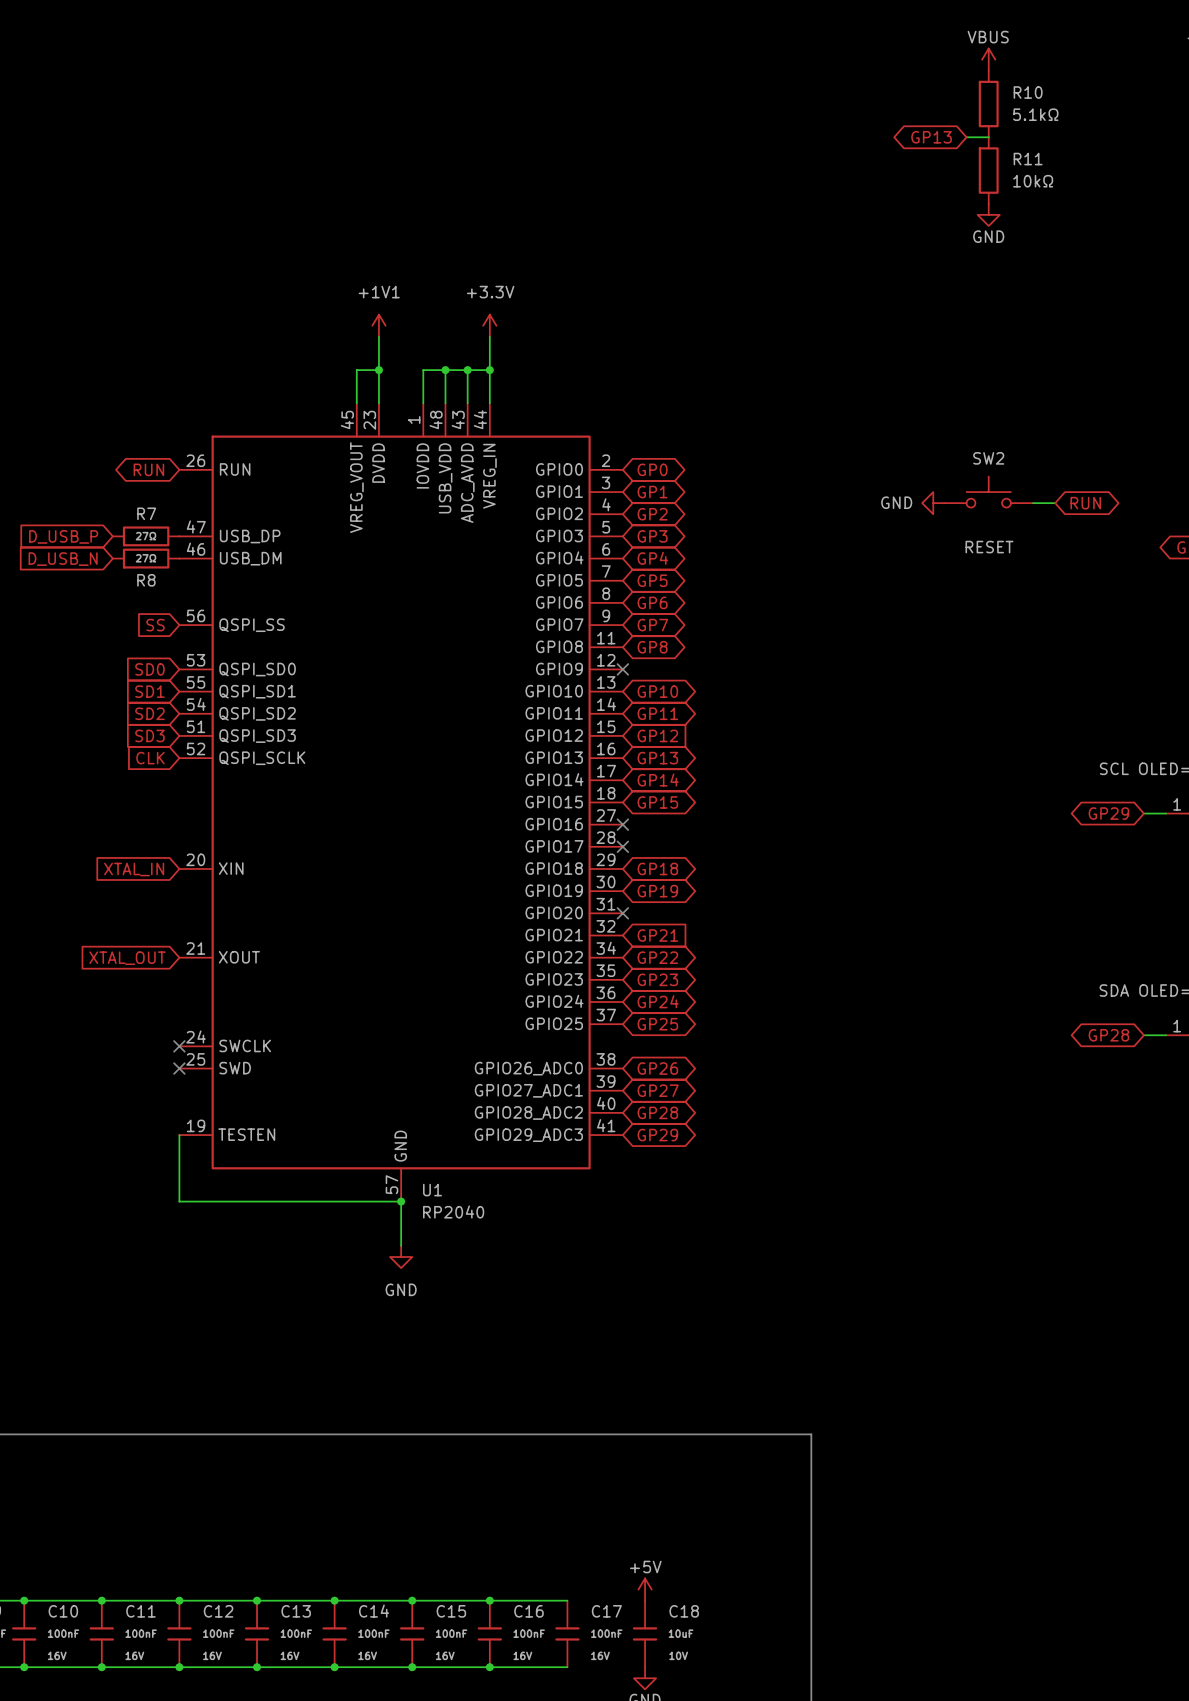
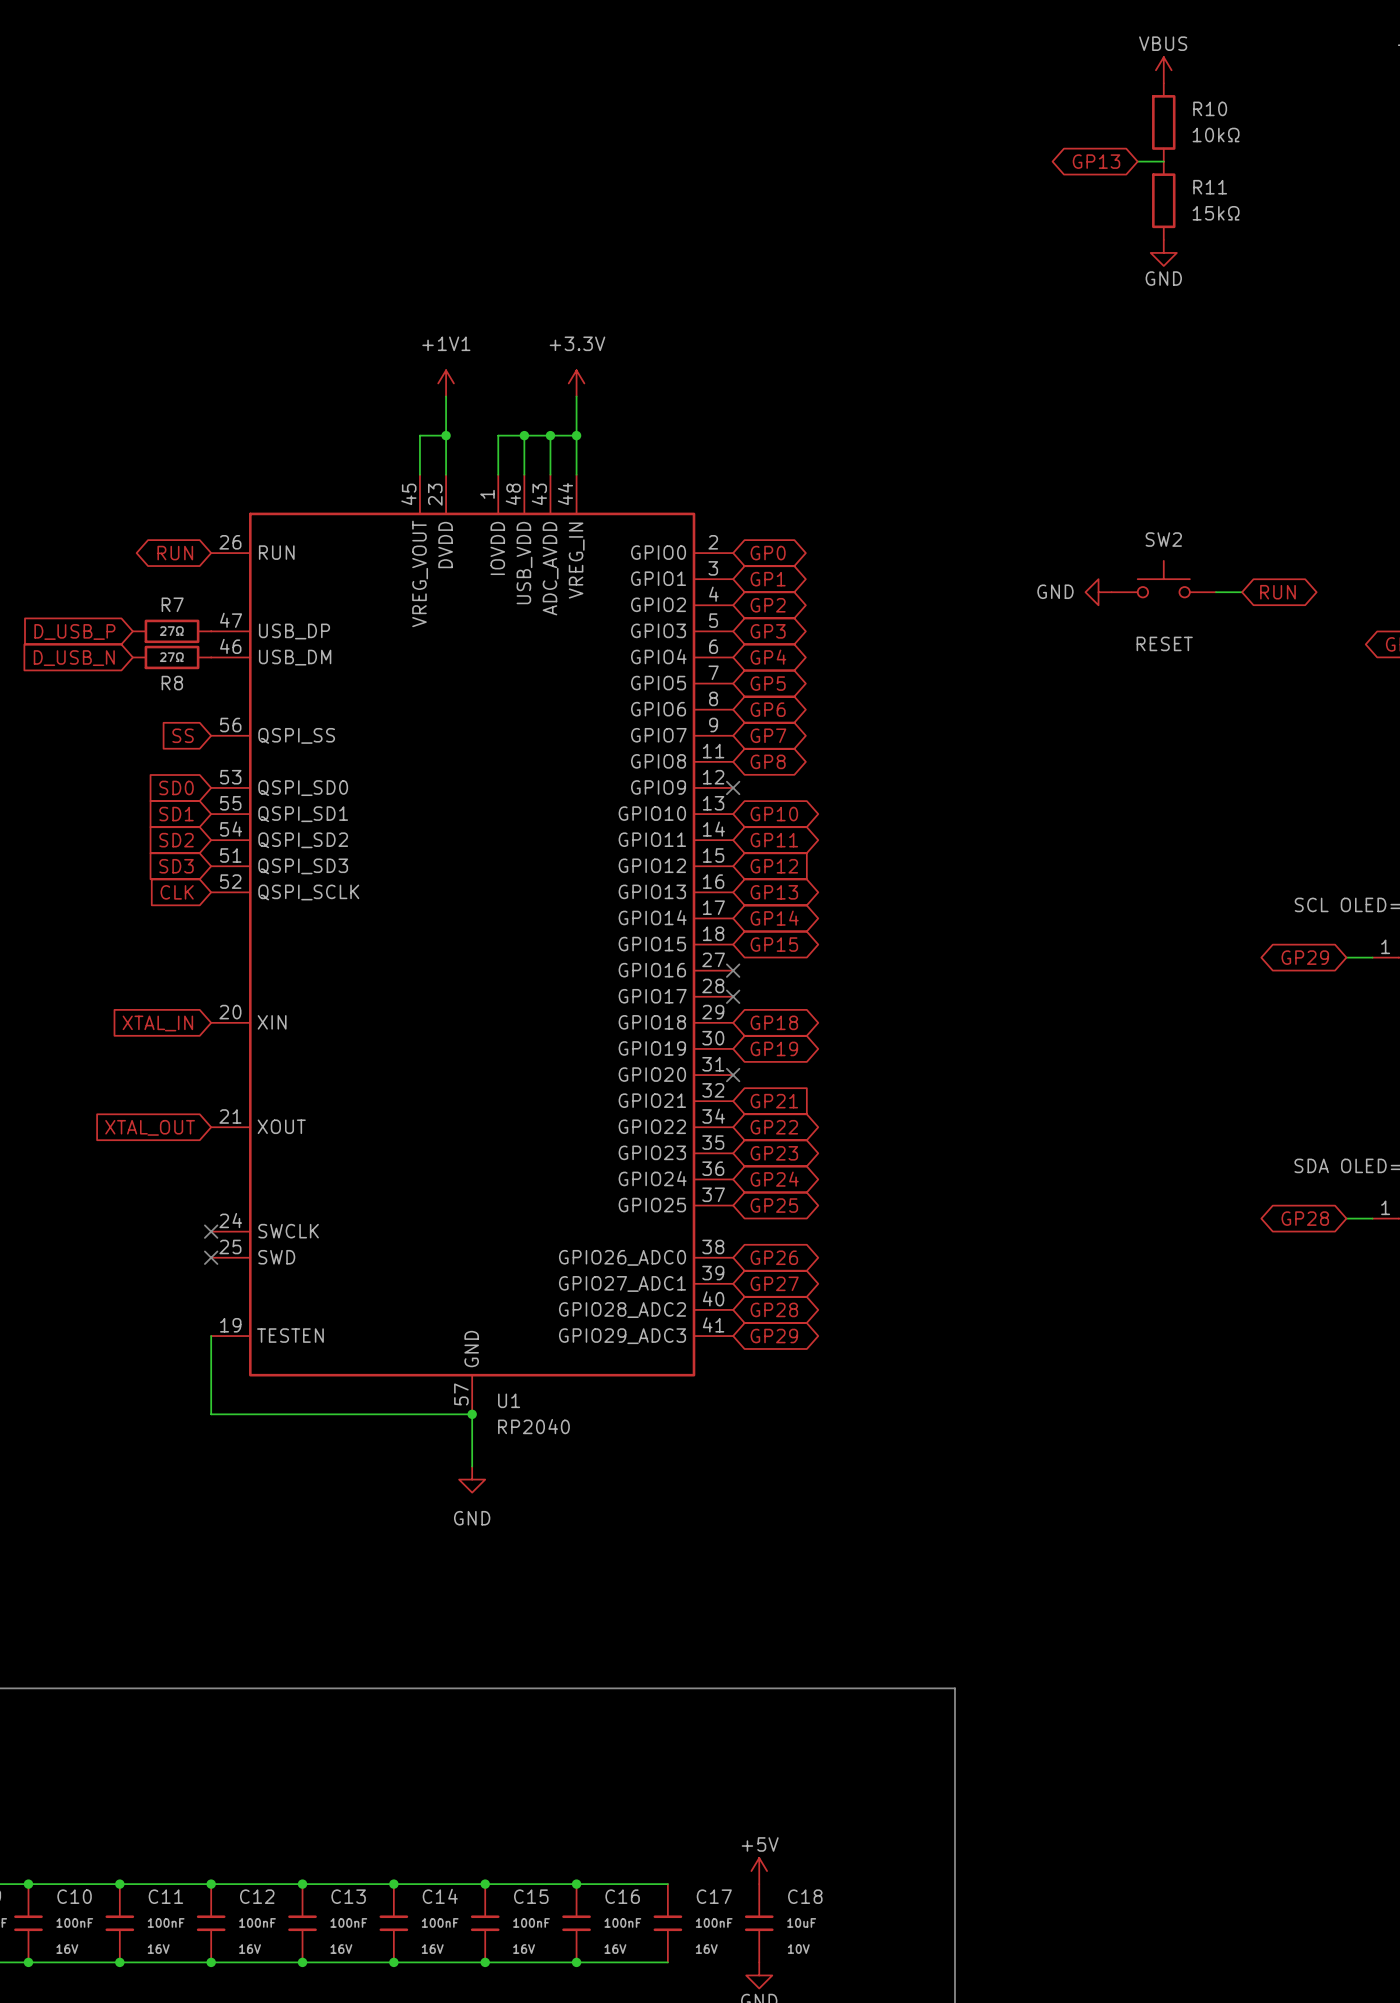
R10 value: 5.1kΩ (1035, 114) -> 10kΩ (1216, 135)
R11 value: 10kΩ (1033, 181) -> 15kΩ (1216, 213)

